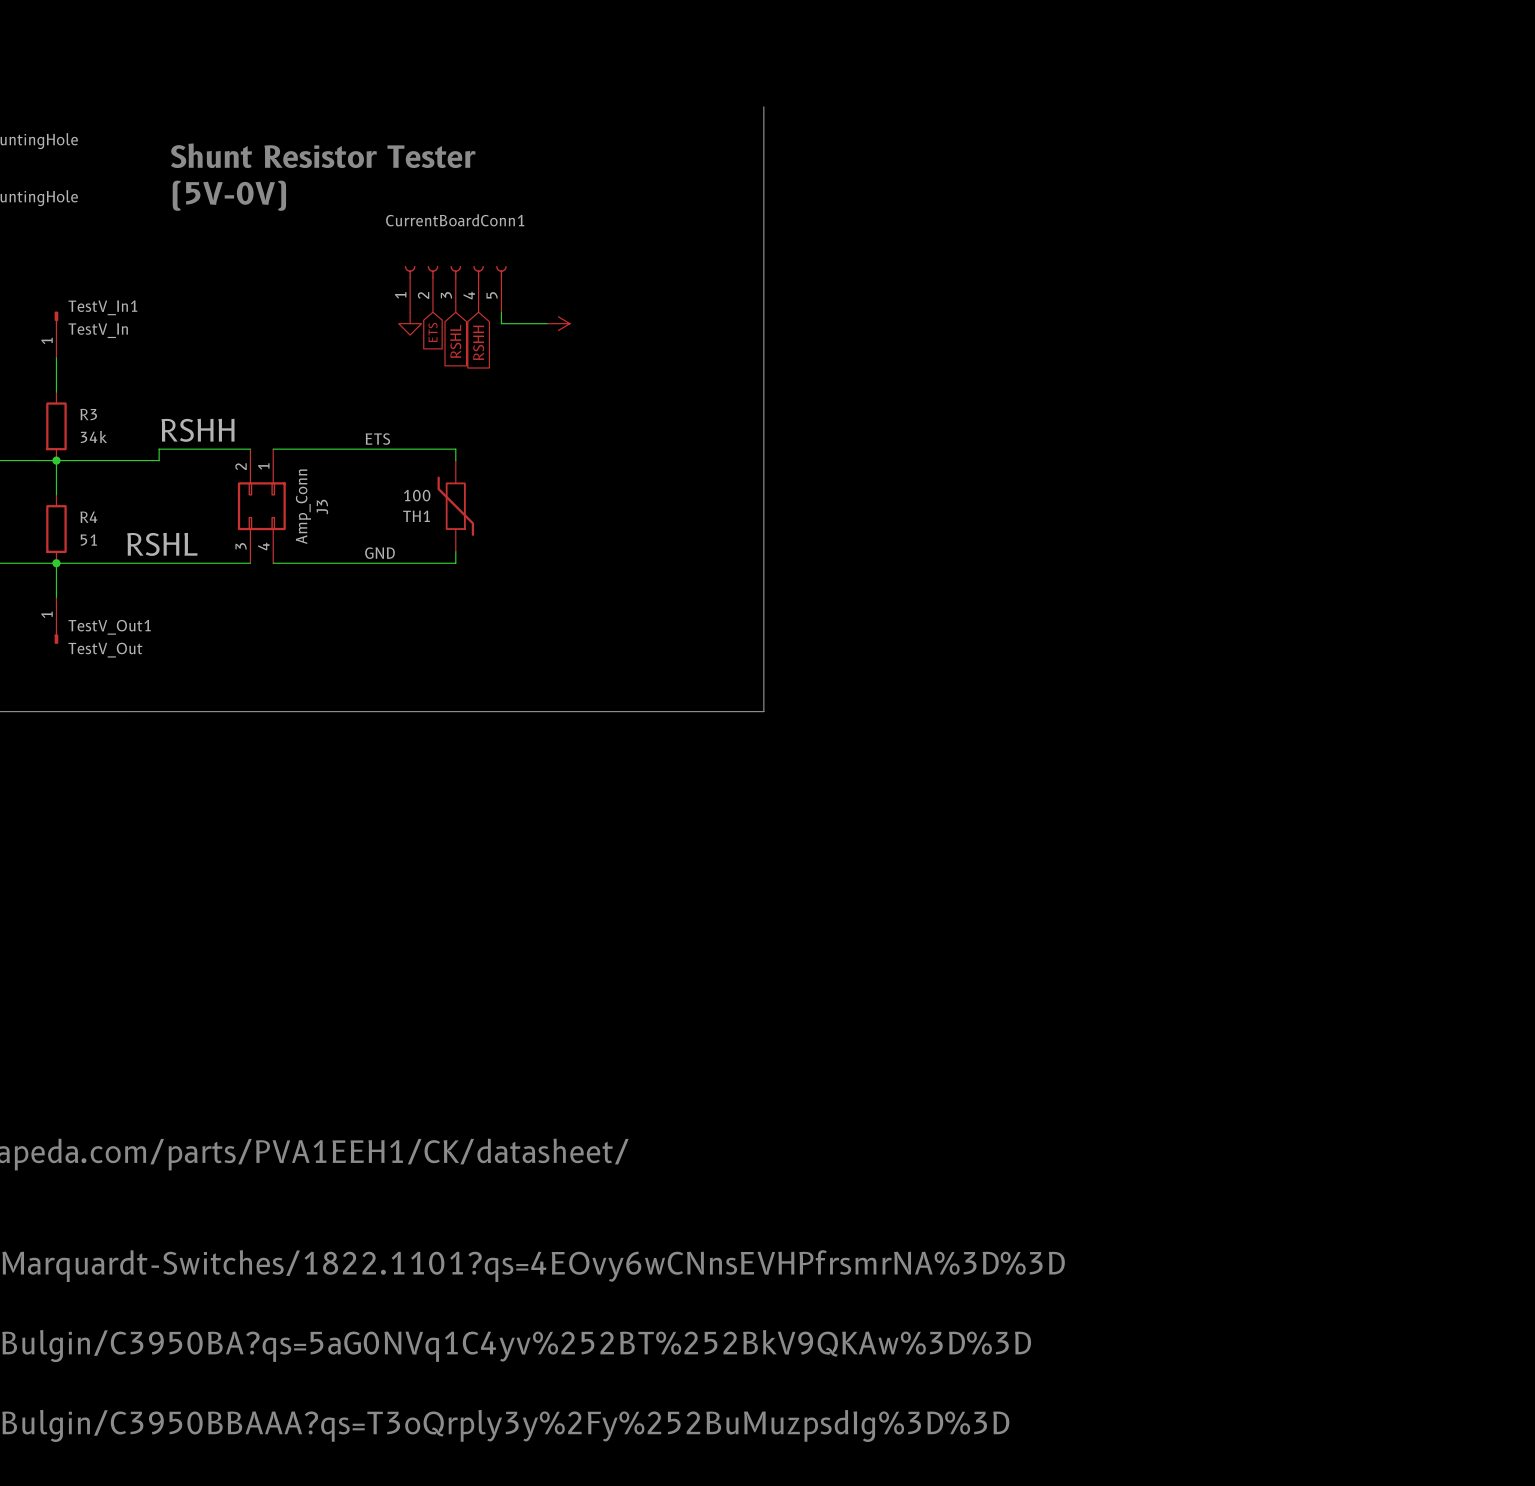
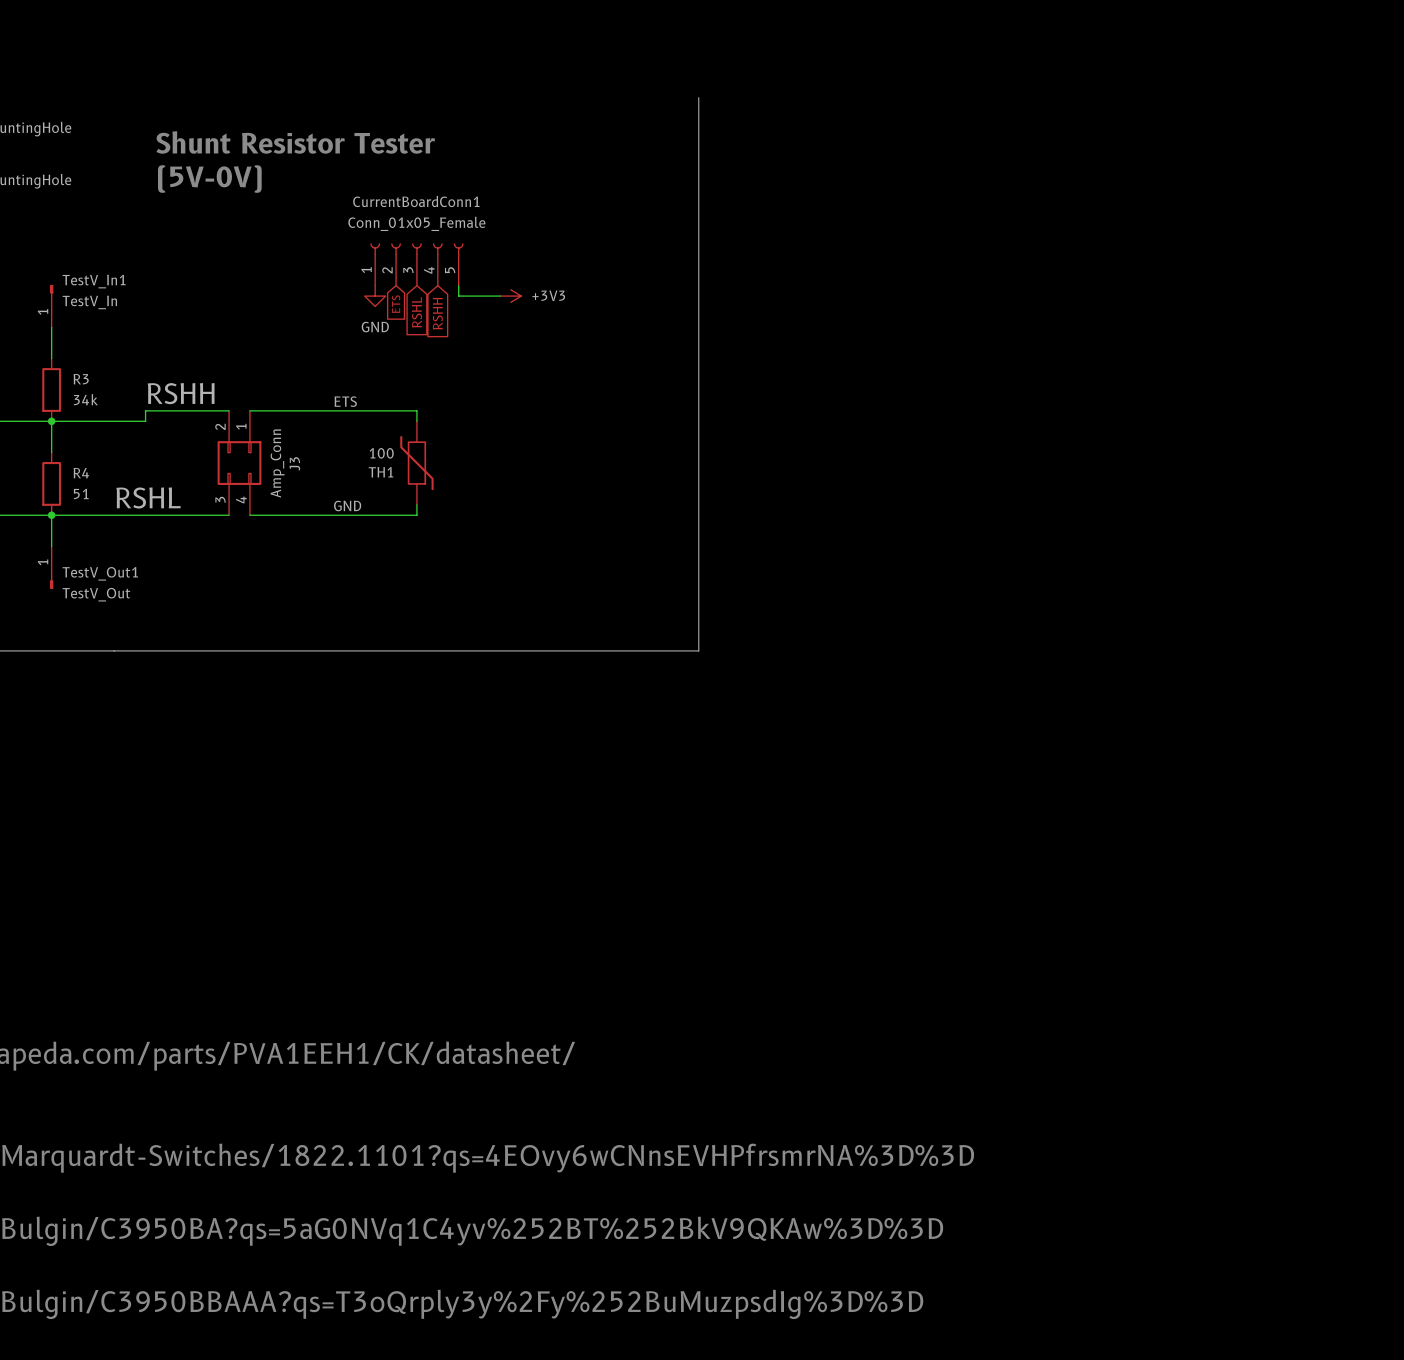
CurrentBoardConn1 value: none -> Conn_01x05_Female (416, 223)
power symbol text: none -> +3V3 (548, 295)
power symbol text: none -> GND (375, 327)

